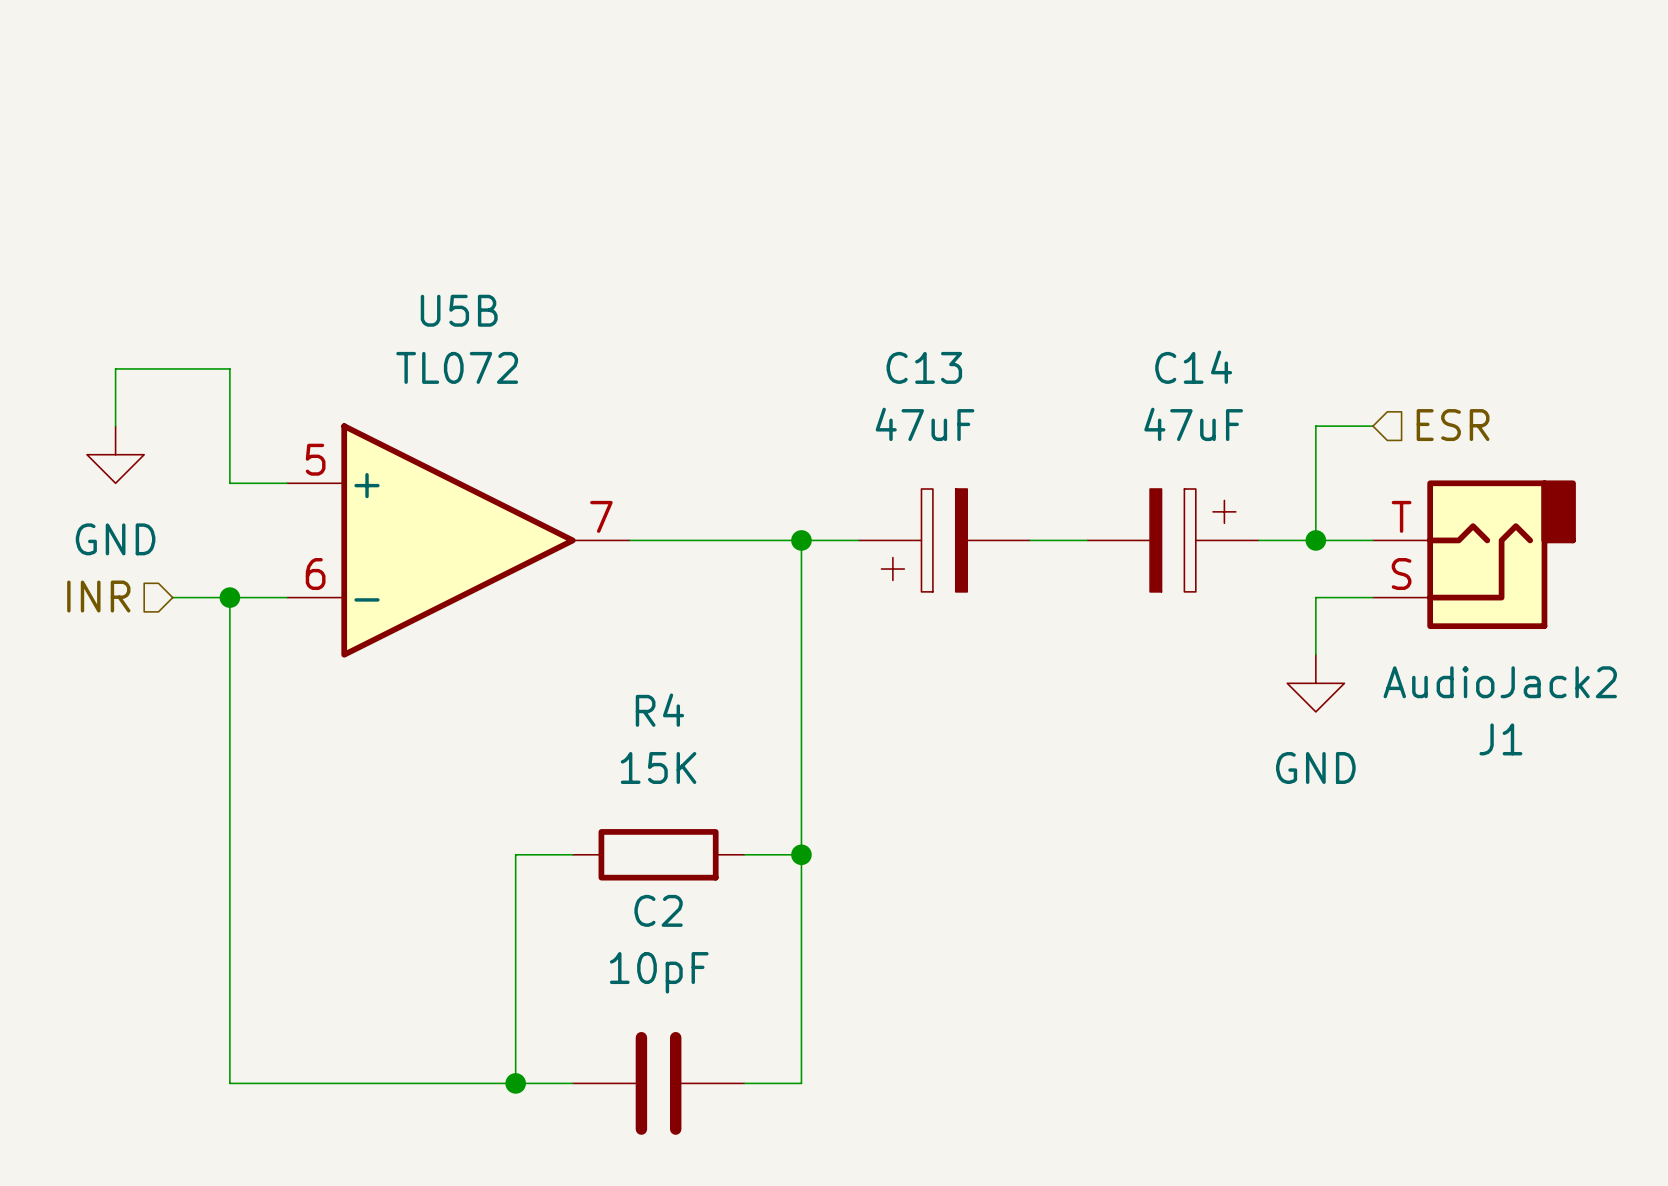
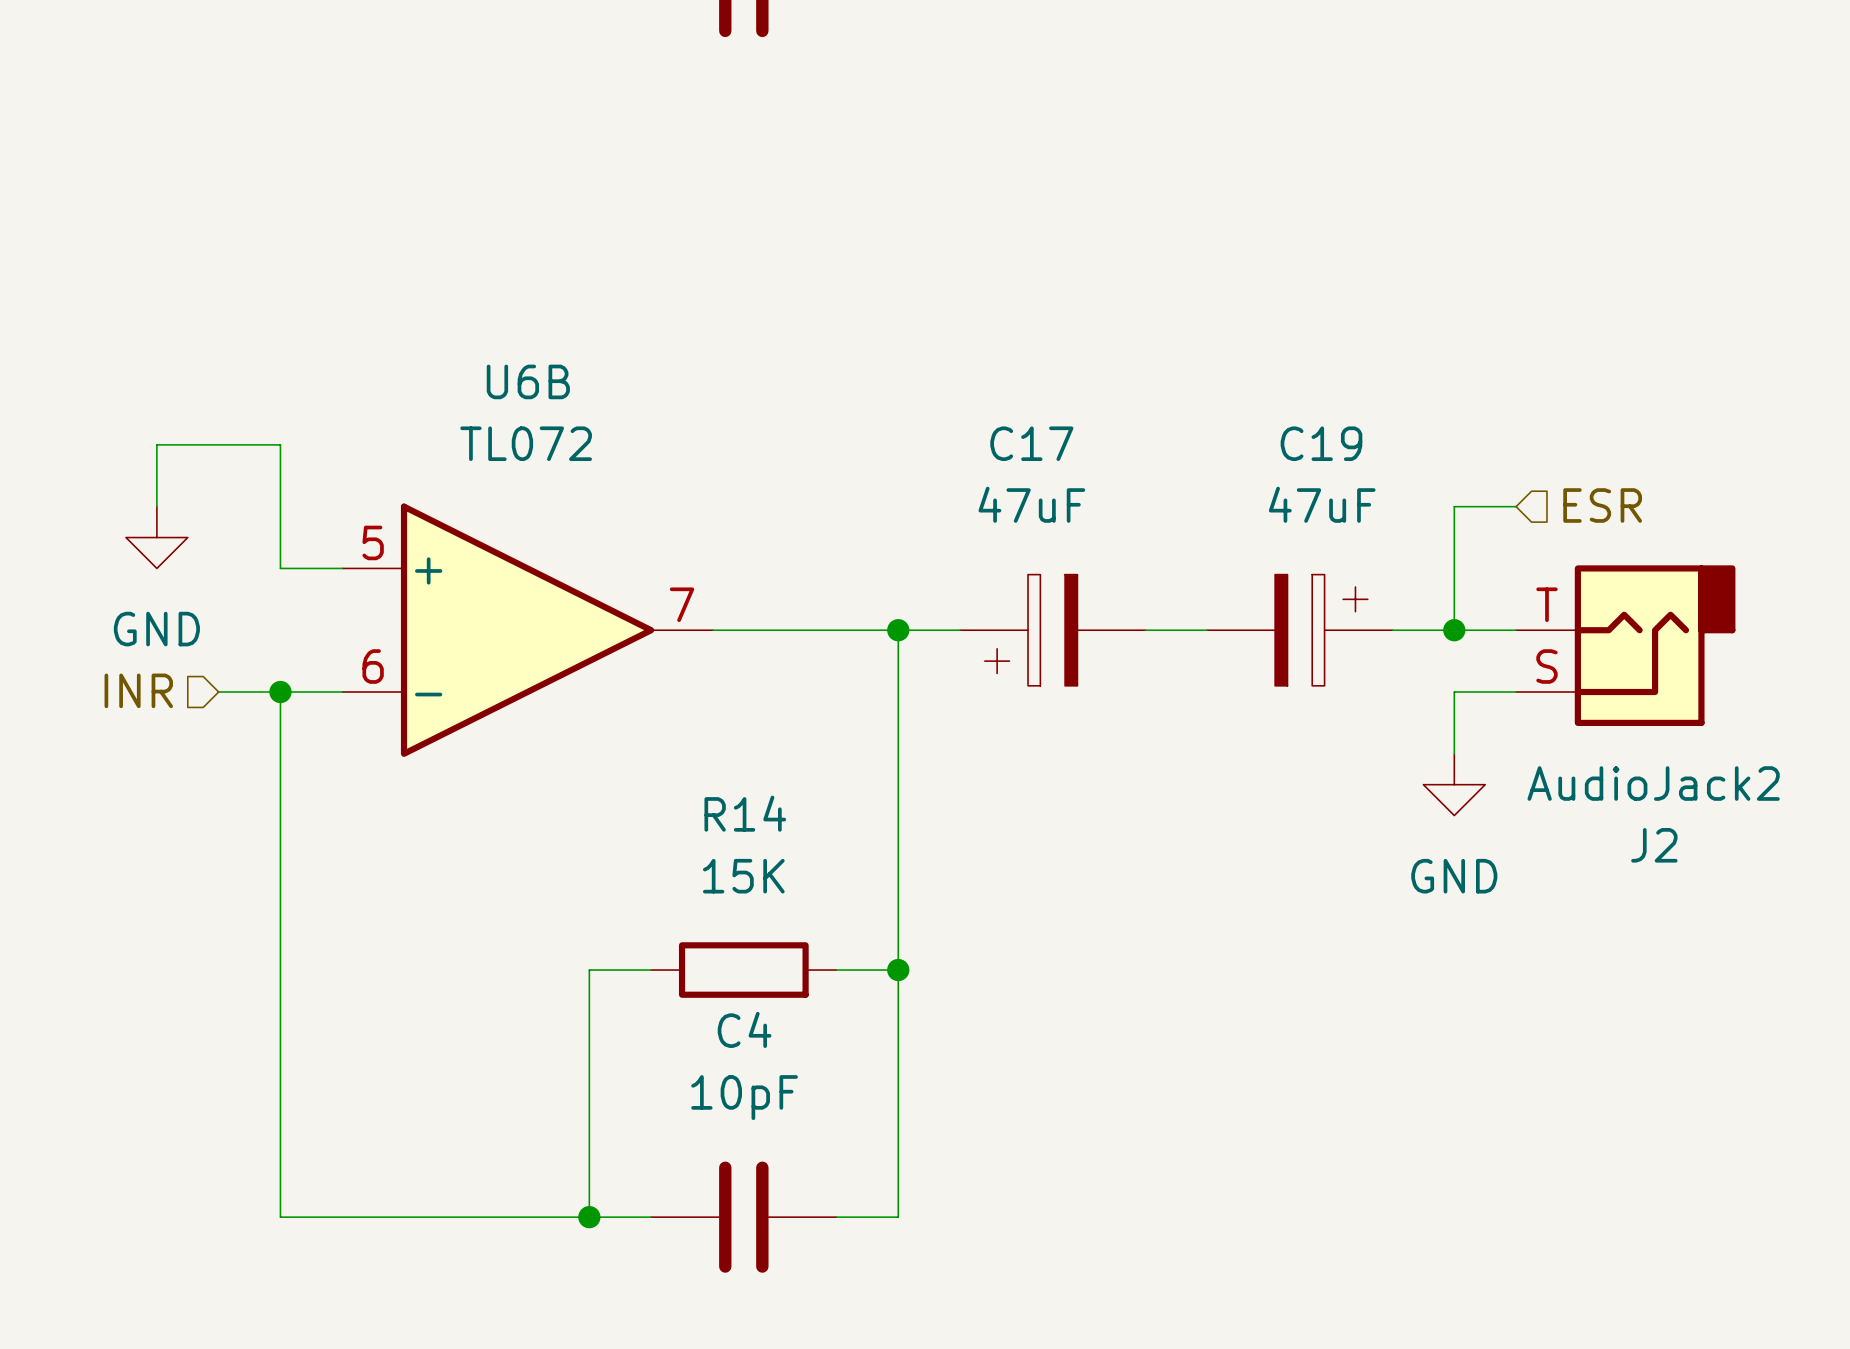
U5B name: U5B (459, 310) -> U6B (528, 381)
C13 name: C13 (924, 367) -> C17 (1031, 443)
C14 name: C14 (1193, 367) -> C19 (1321, 443)
R4 name: R4 (659, 710) -> R14 (745, 813)
J1 name: J1 (1500, 739) -> J2 (1654, 845)
C2 name: C2 (658, 910) -> C4 (744, 1029)

